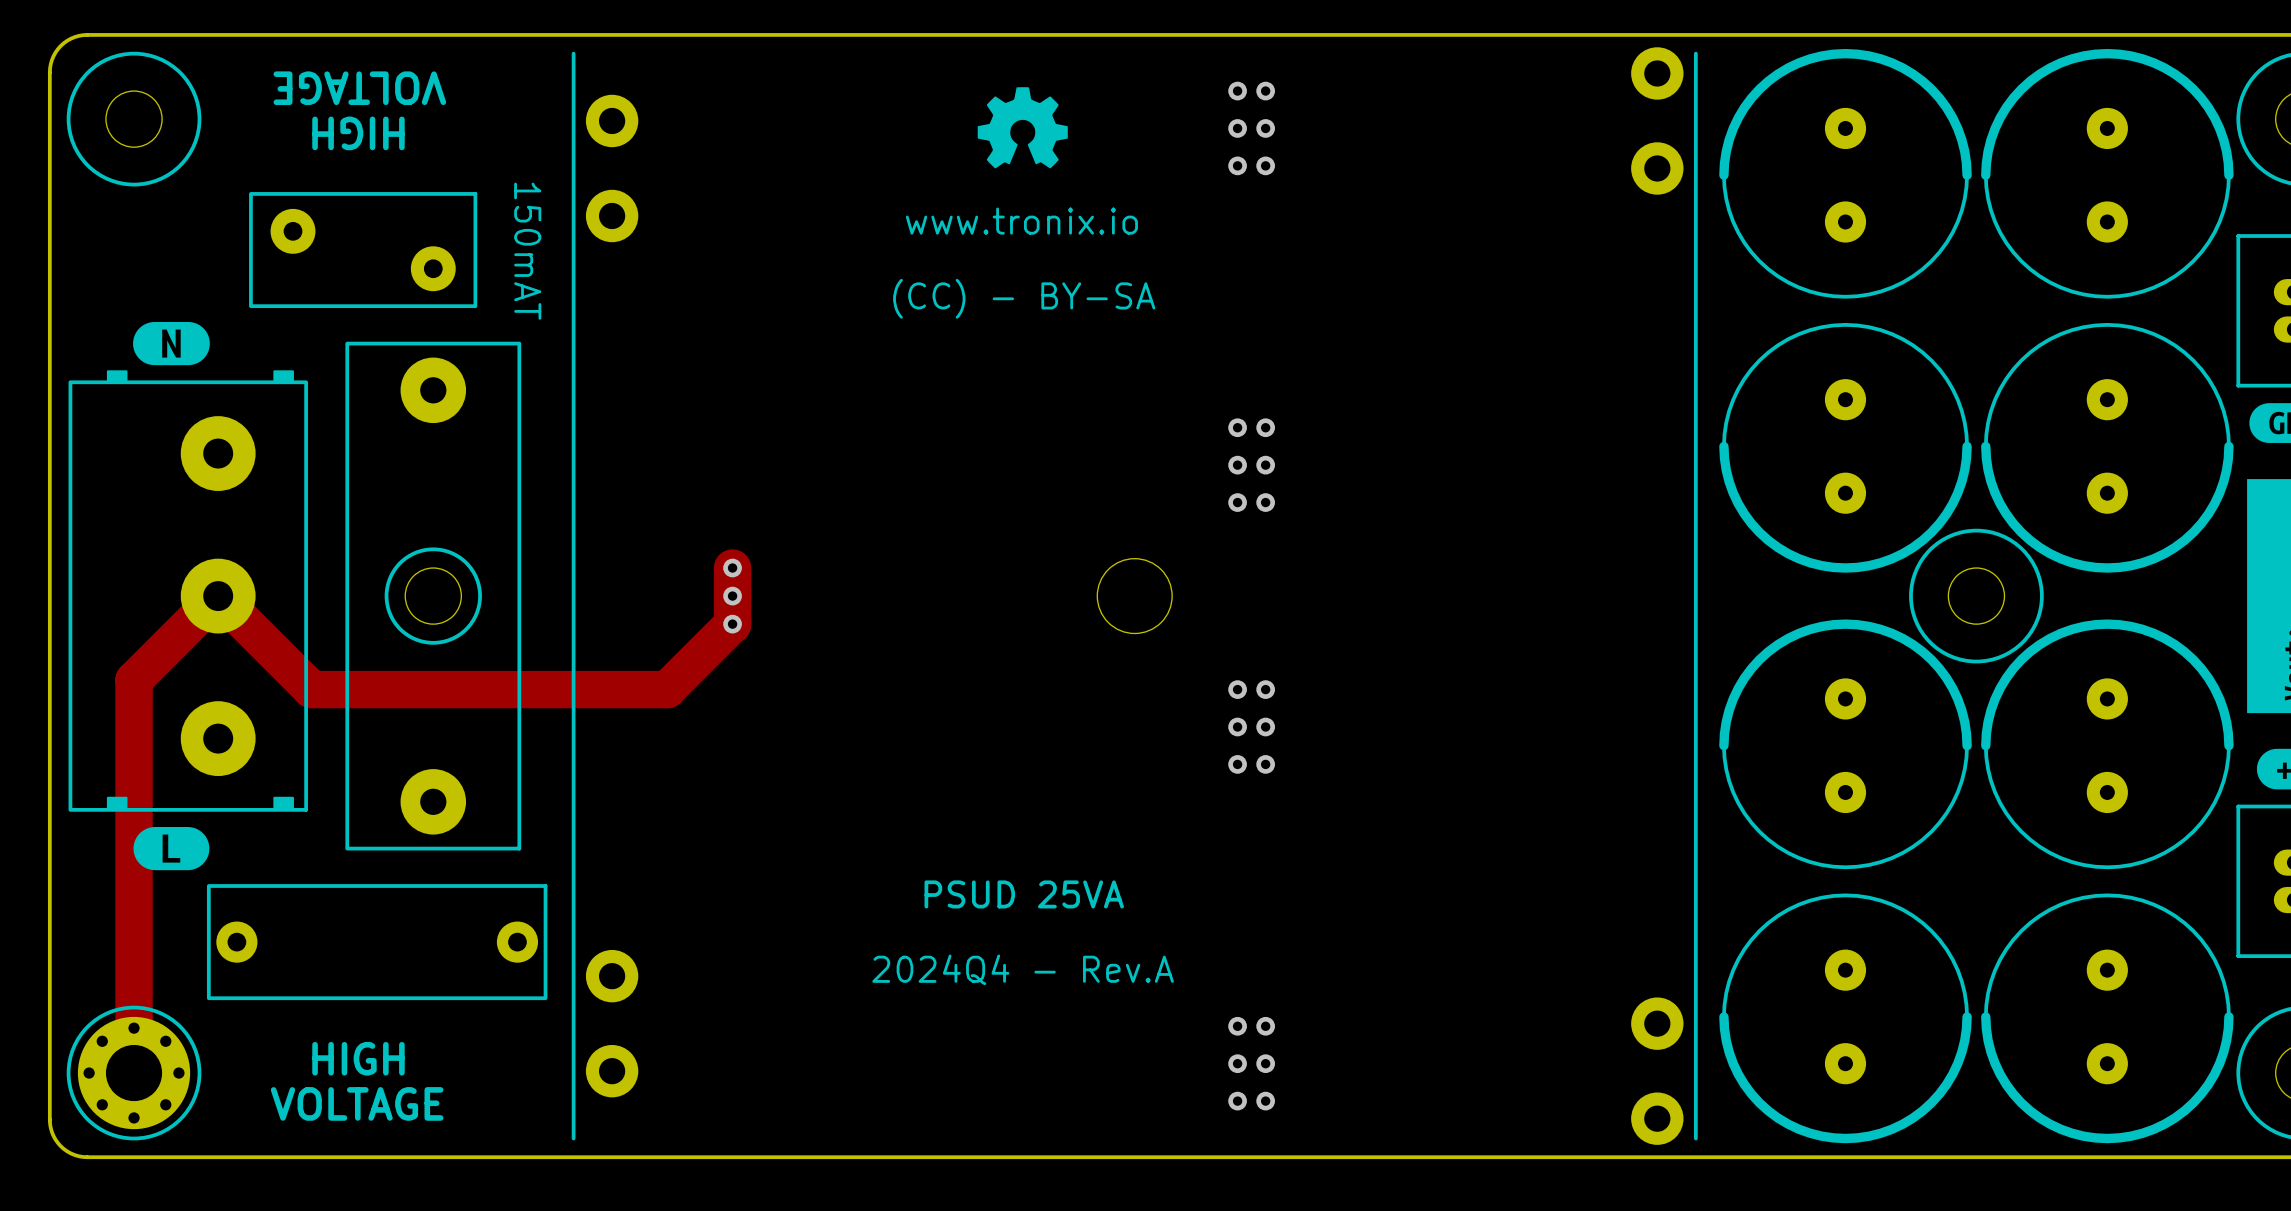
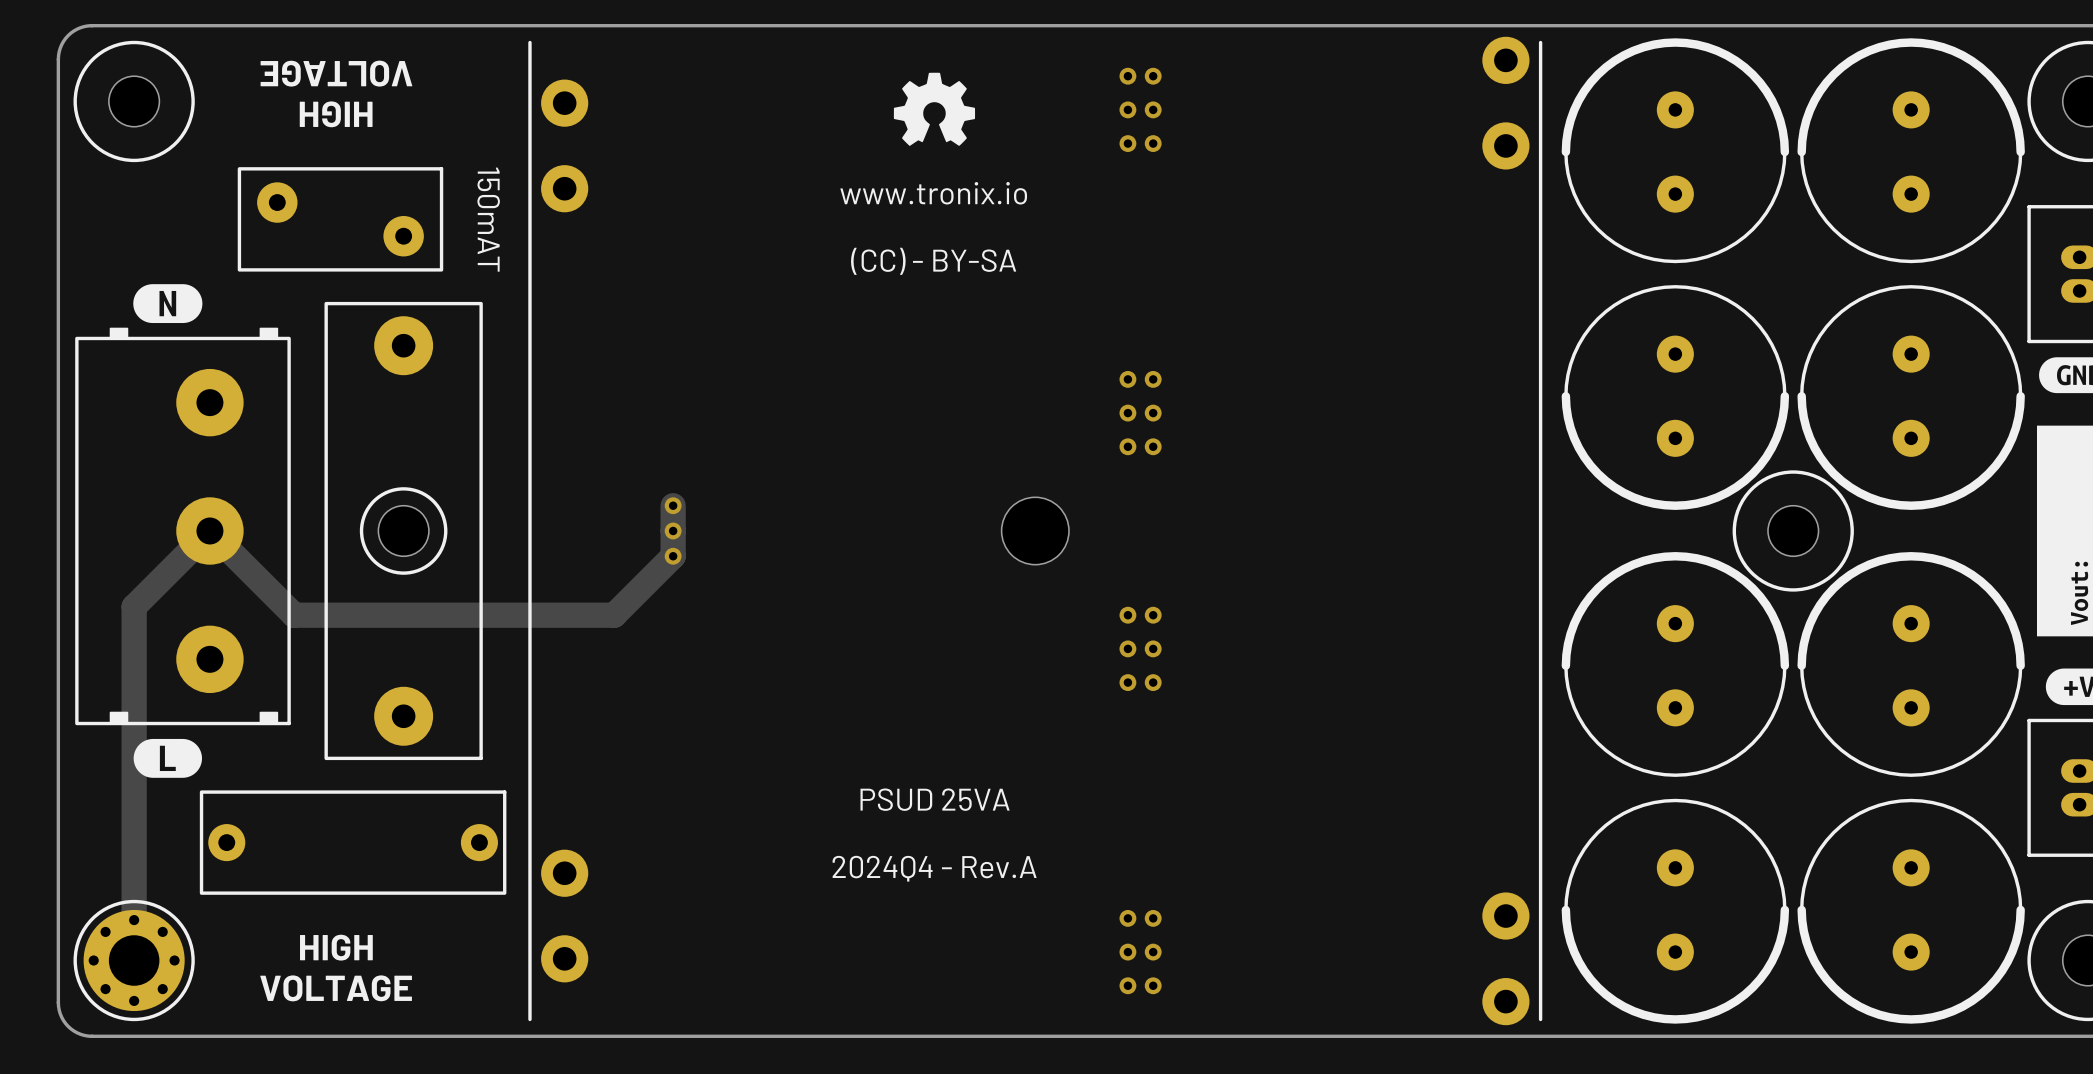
track width: thick (732, 568) (732, 624) (667, 689) (311, 689) (218, 596) (134, 680) (134, 1028) -> thin (673, 505) (673, 556) (614, 615) (294, 615) (209, 530) (134, 606) (134, 920)

